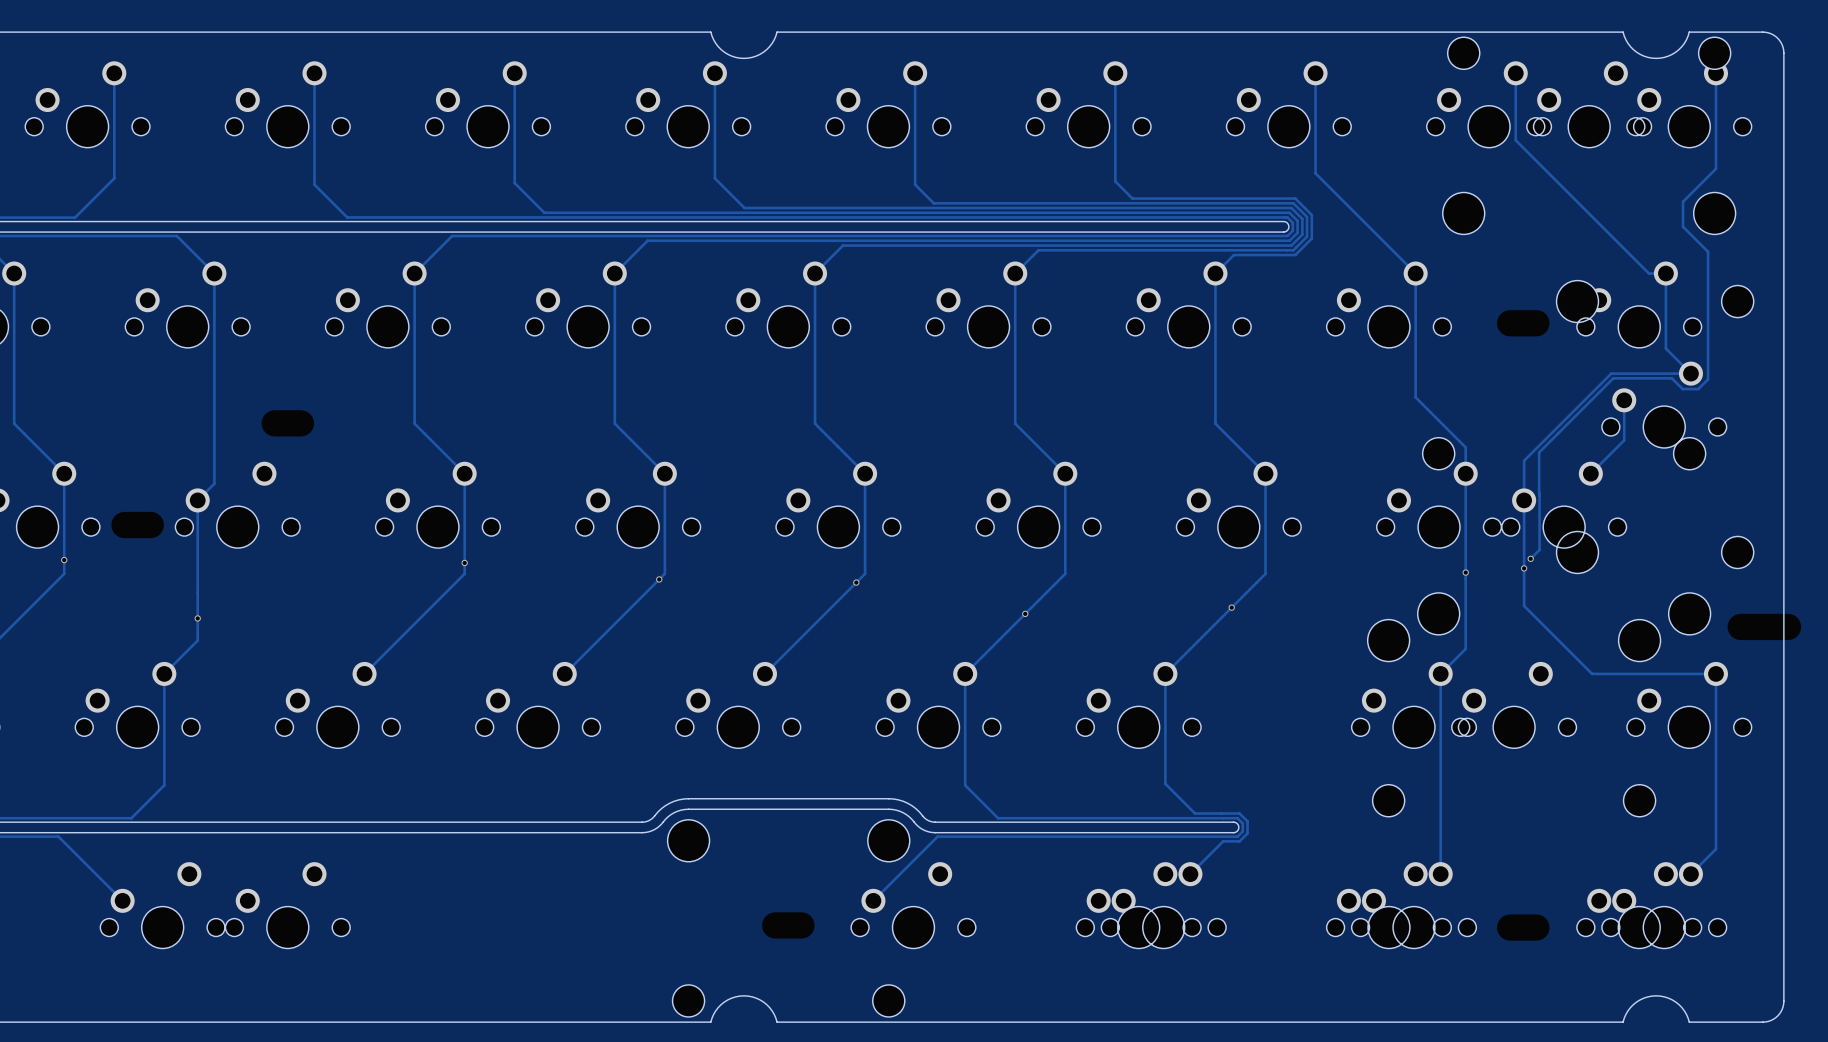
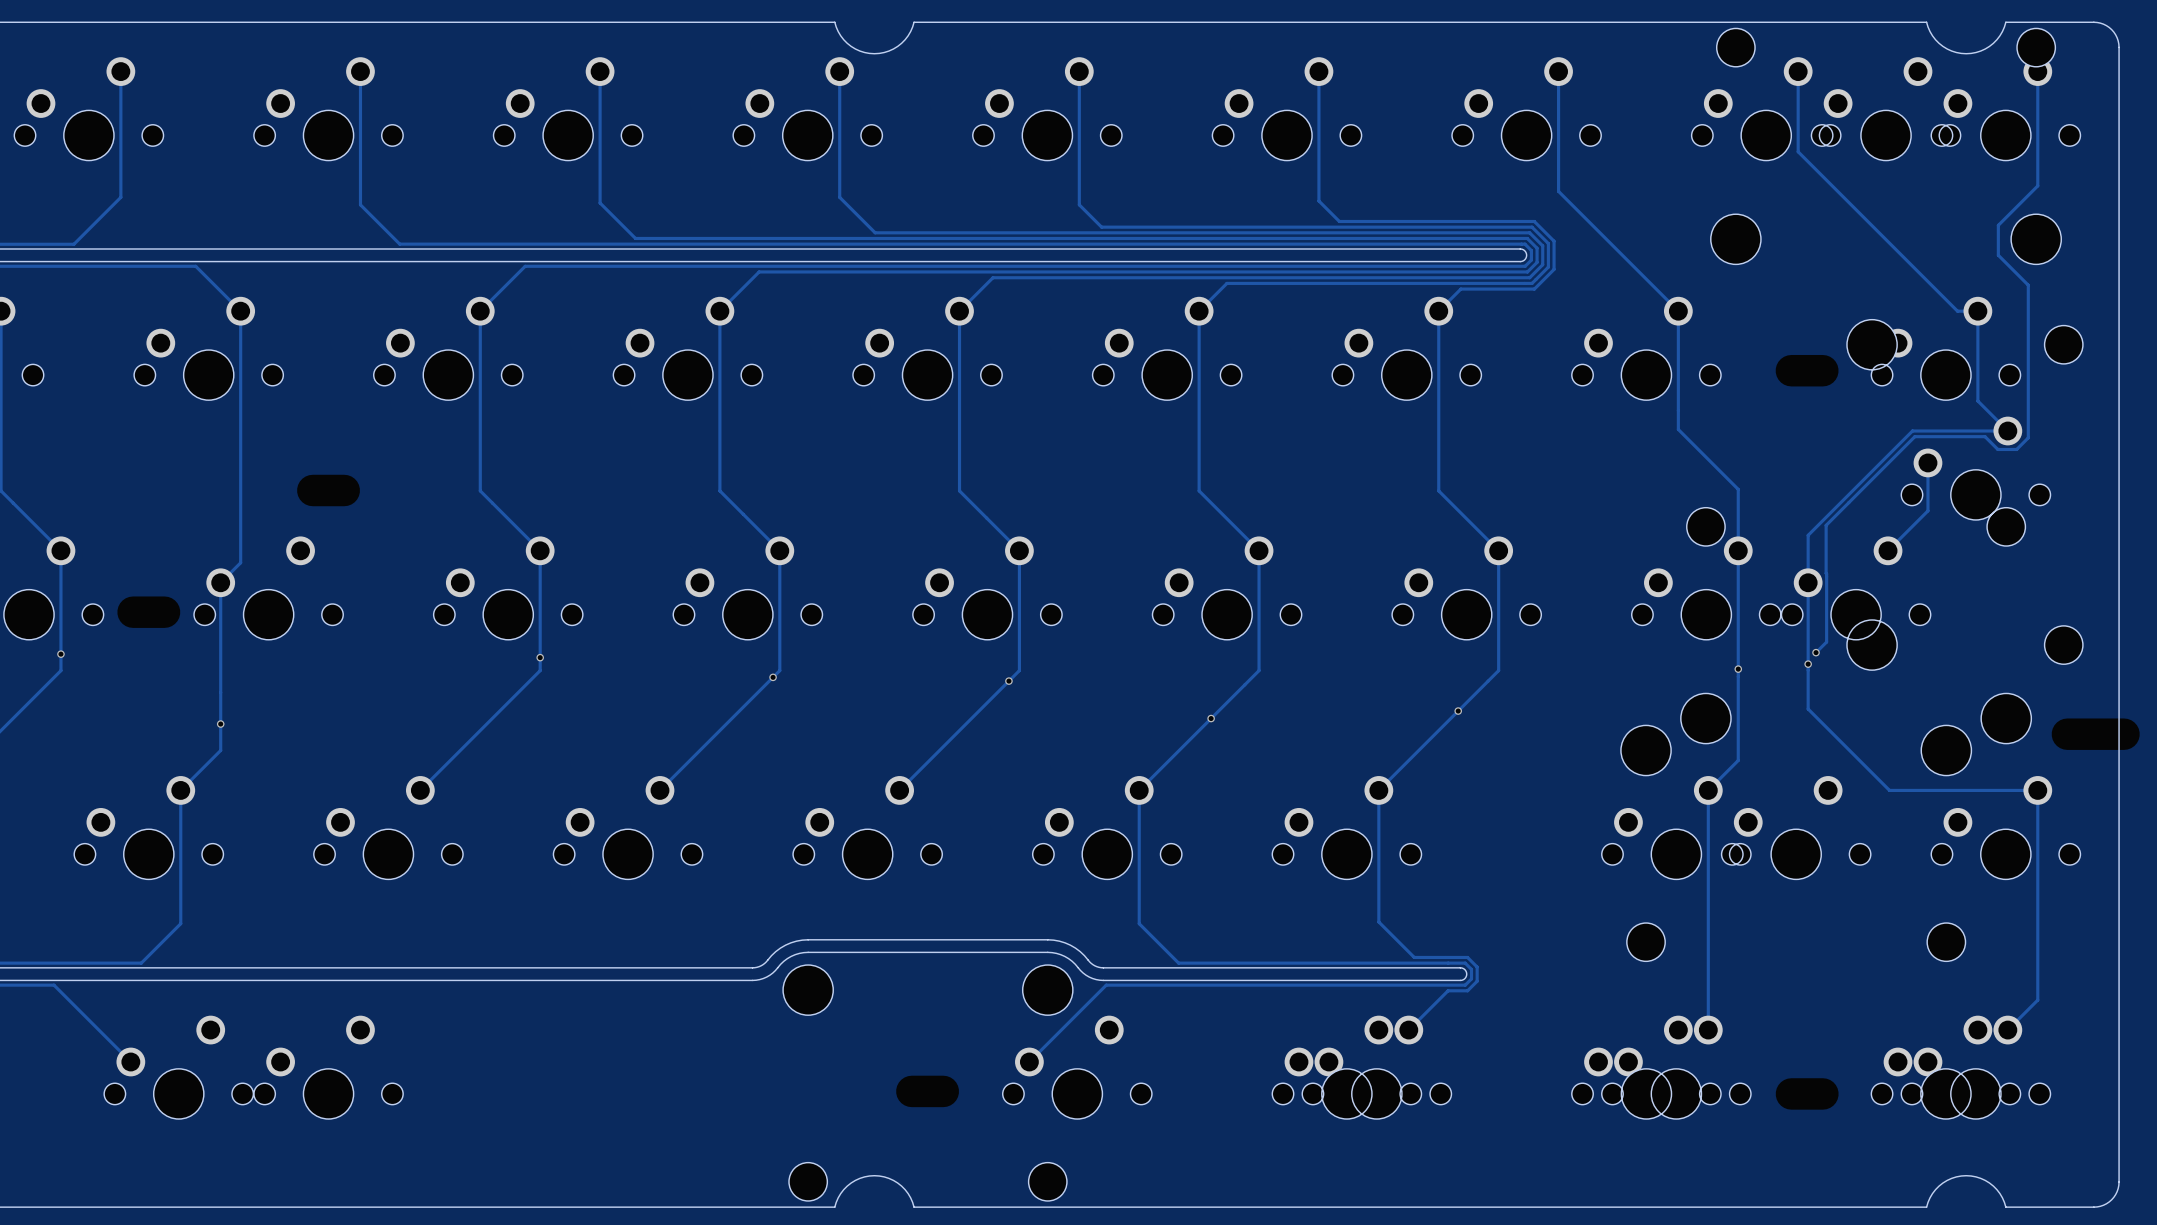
track: (1415, 372) (1415, 397) (1465, 447) -> (1678, 429) (1738, 489) (1738, 519)

